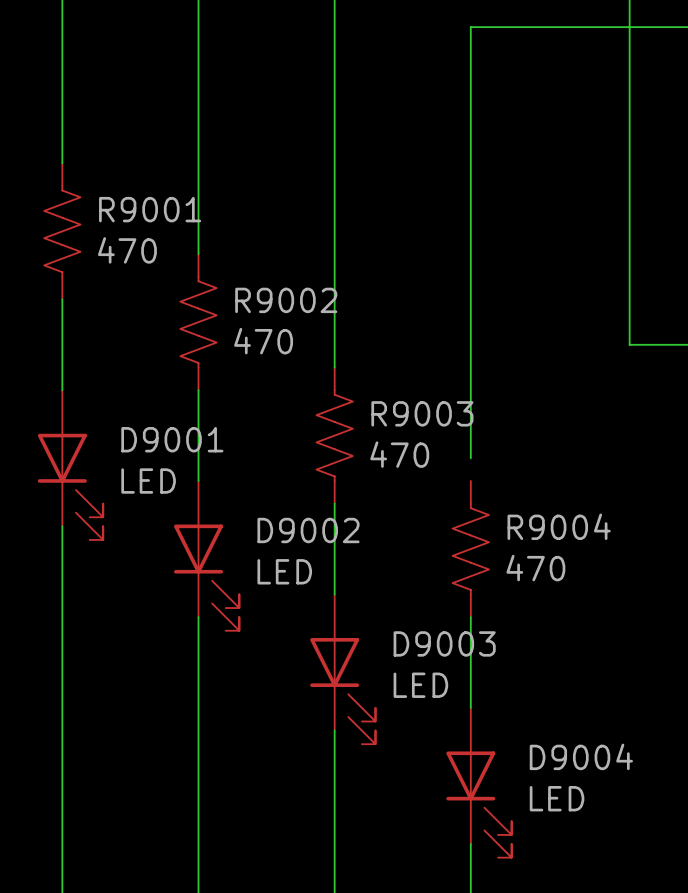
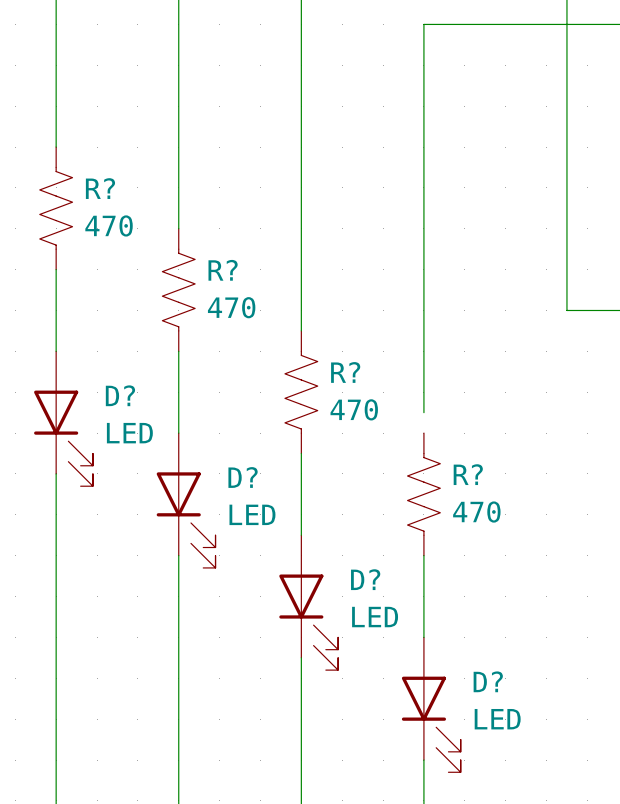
R9001 name: R9001 (150, 209) -> R? (100, 188)
R9002 name: R9002 (286, 300) -> R? (223, 270)
R9003 name: R9003 (422, 413) -> R? (345, 372)
D9001 name: D9001 (172, 439) -> D? (120, 395)
R9004 name: R9004 (559, 526) -> R? (468, 474)
D9002 name: D9002 (308, 530) -> D? (243, 477)
D9003 name: D9003 (444, 643) -> D? (365, 579)
D9004 name: D9004 (581, 756) -> D? (488, 681)

